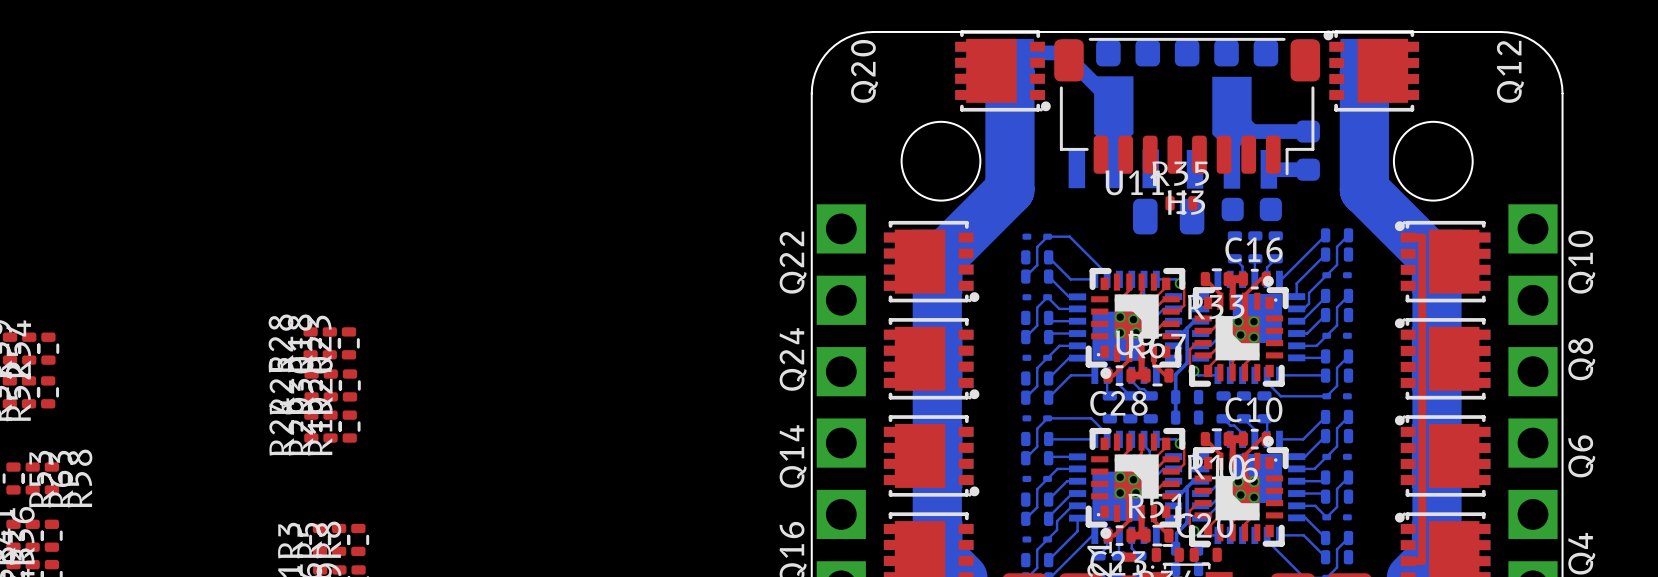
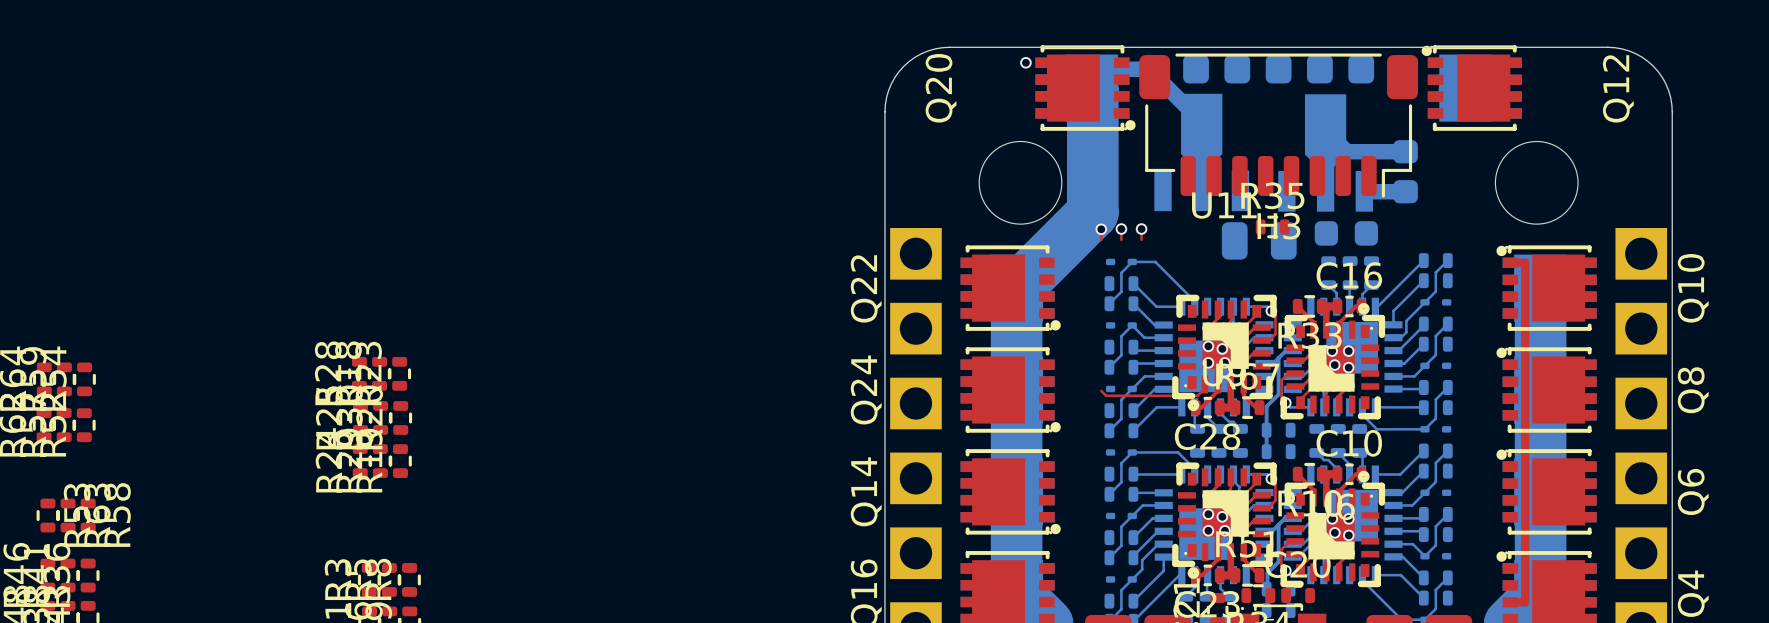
via: none -> (1025, 62)
bottom track: (1364, 72) (1364, 189) (1436, 261) -> none
top track: none -> (1101, 229) (1101, 239)
via: none -> (1101, 229)
top track: none -> (1121, 229) (1121, 239)
via: none -> (1121, 229)
top track: none -> (1141, 229) (1141, 239)
via: none -> (1141, 229)
top track: none -> (1205, 384) (1205, 388) (1197, 395) (1106, 395) (1101, 390)

